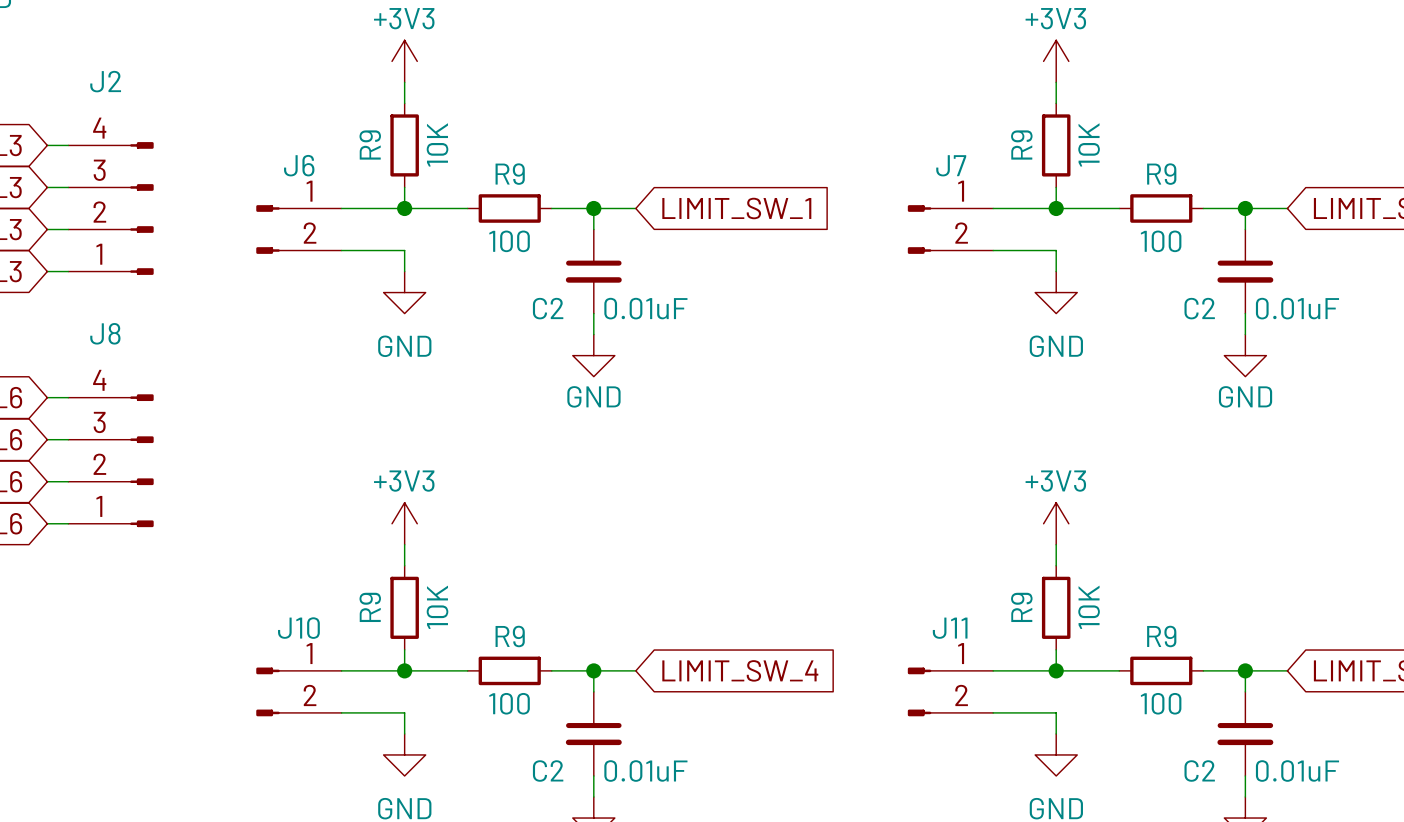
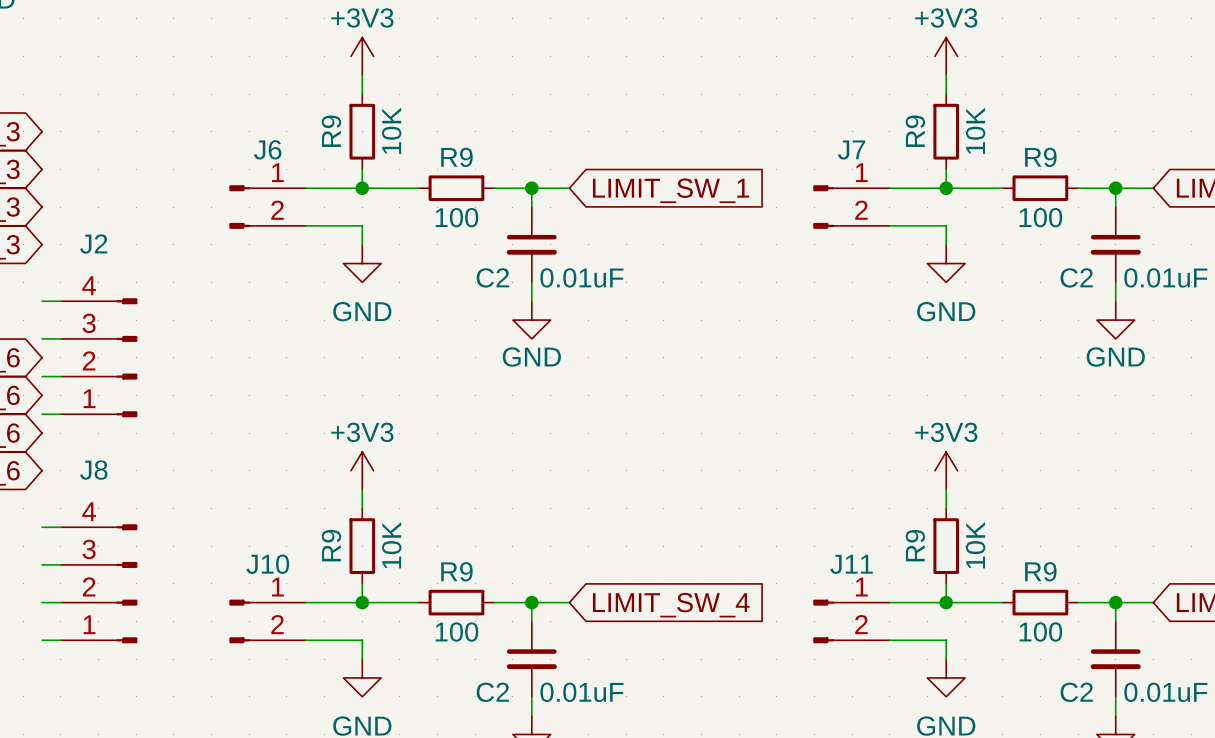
wire: (47, 145) (68, 145) -> (42, 301) (60, 301)
wire: (47, 187) (68, 187) -> (42, 338) (60, 338)
J2 position: (111, 208) -> (99, 357)
wire: (47, 229) (68, 229) -> (42, 376) (60, 376)
wire: (47, 271) (68, 271) -> (42, 414) (60, 414)
wire: (47, 397) (68, 397) -> (42, 527) (60, 527)
wire: (47, 439) (68, 439) -> (42, 564) (60, 564)
J8 position: (111, 460) -> (99, 583)
wire: (47, 481) (68, 481) -> (42, 602) (60, 602)
wire: (47, 523) (68, 523) -> (42, 640) (60, 640)

